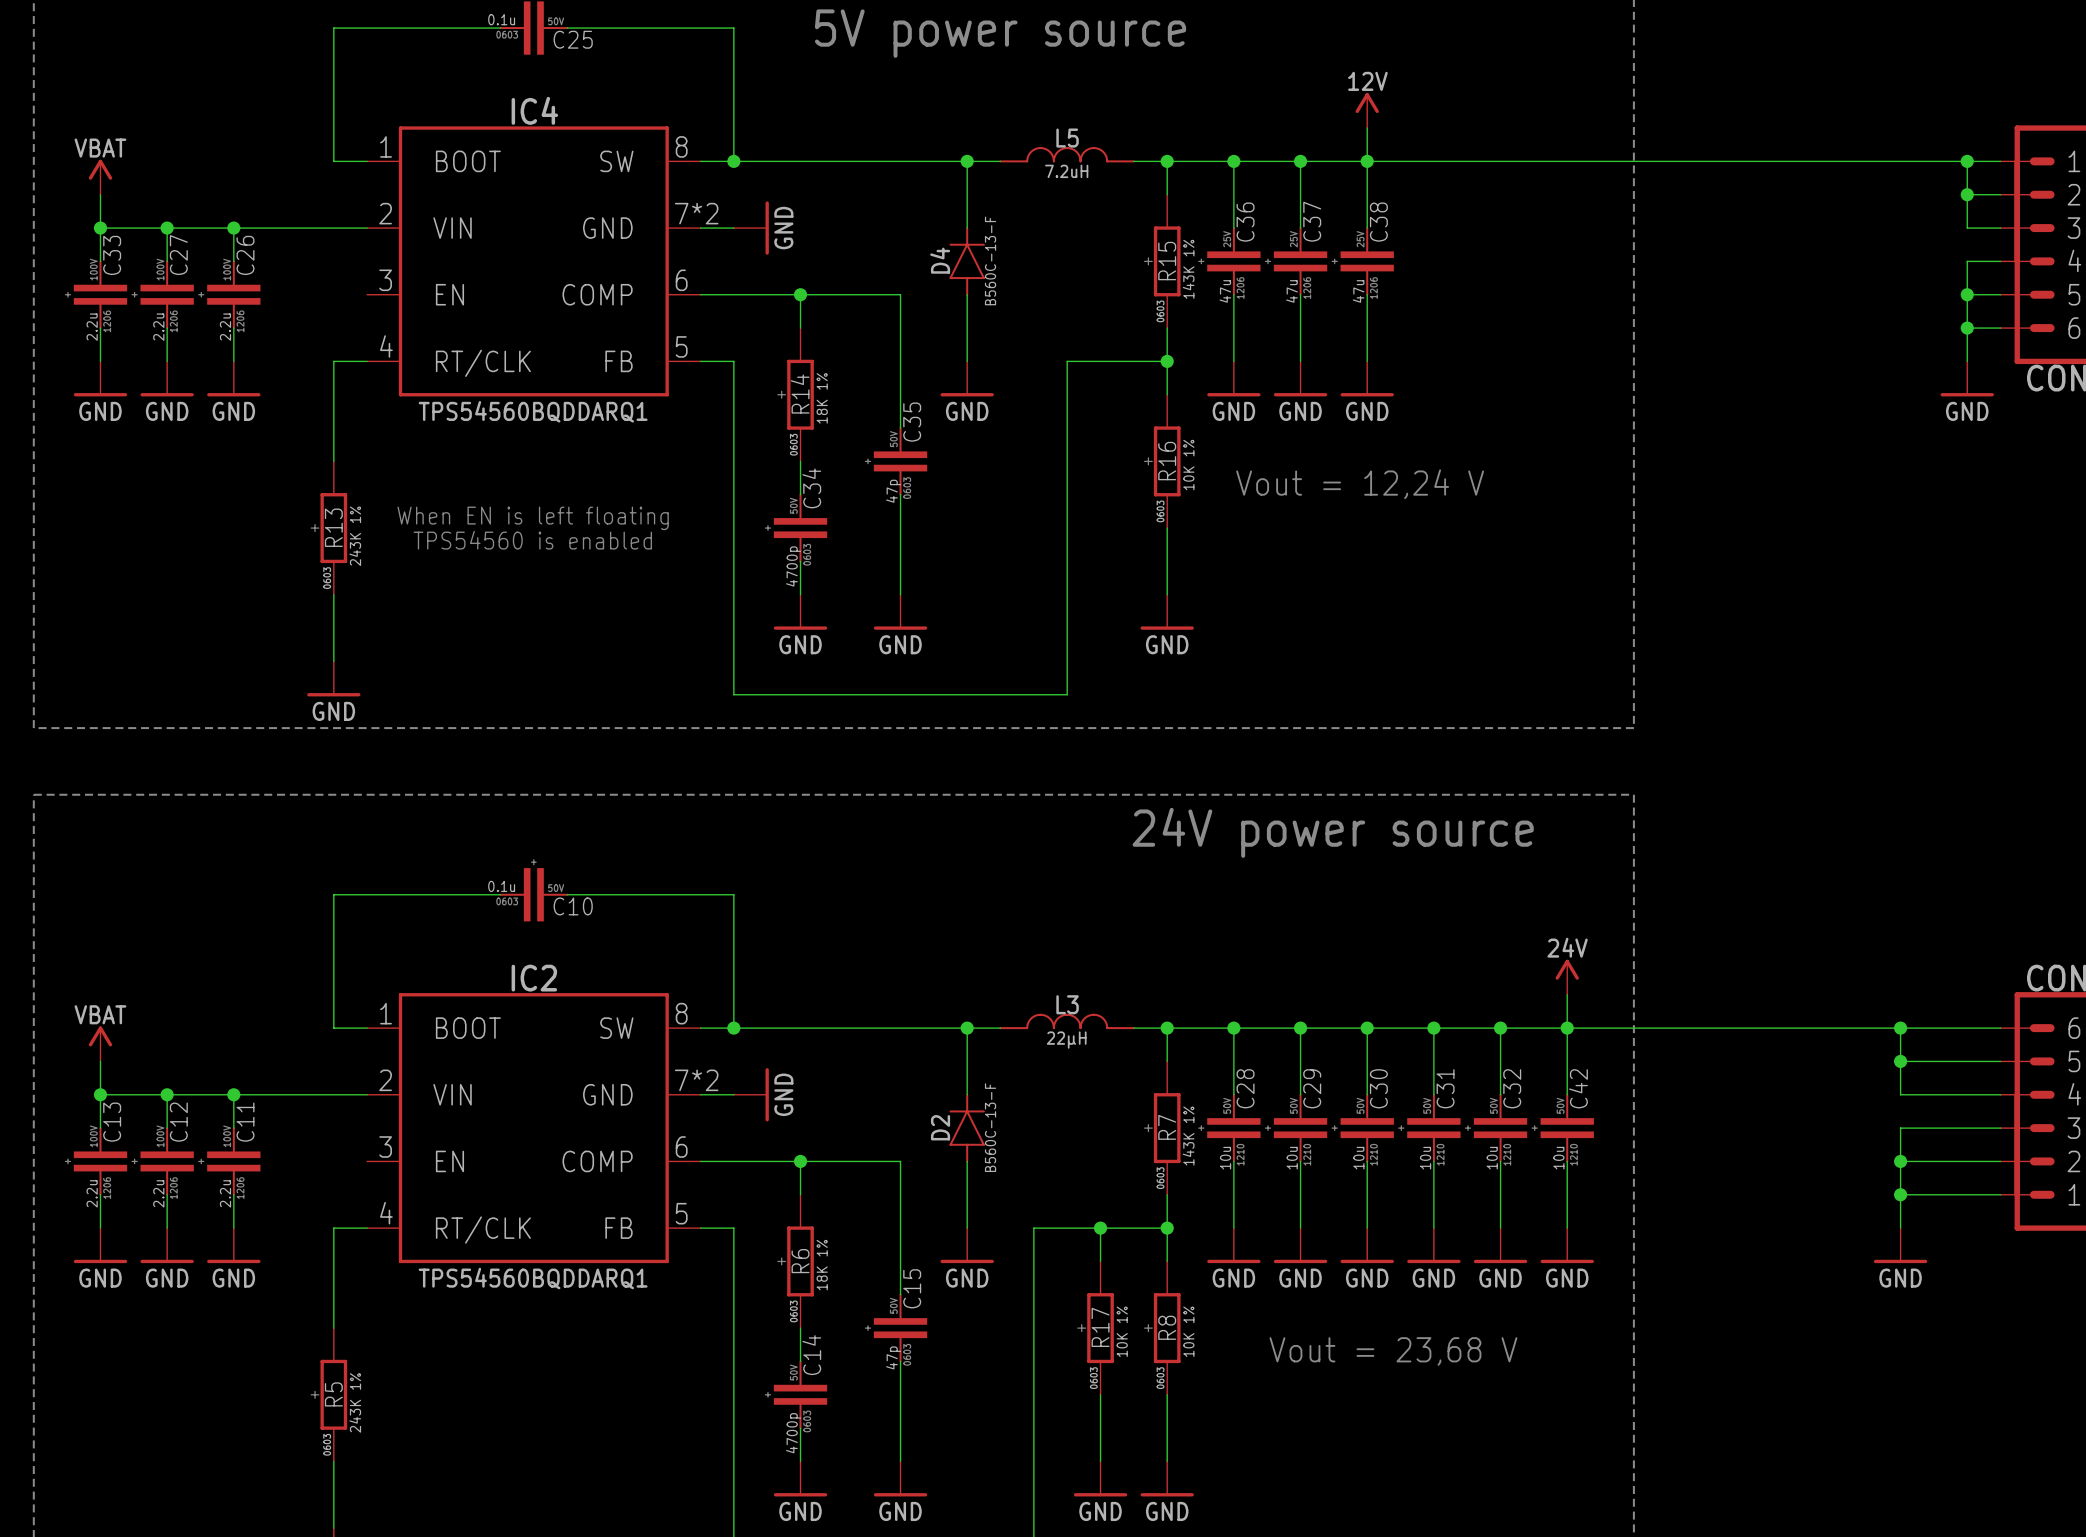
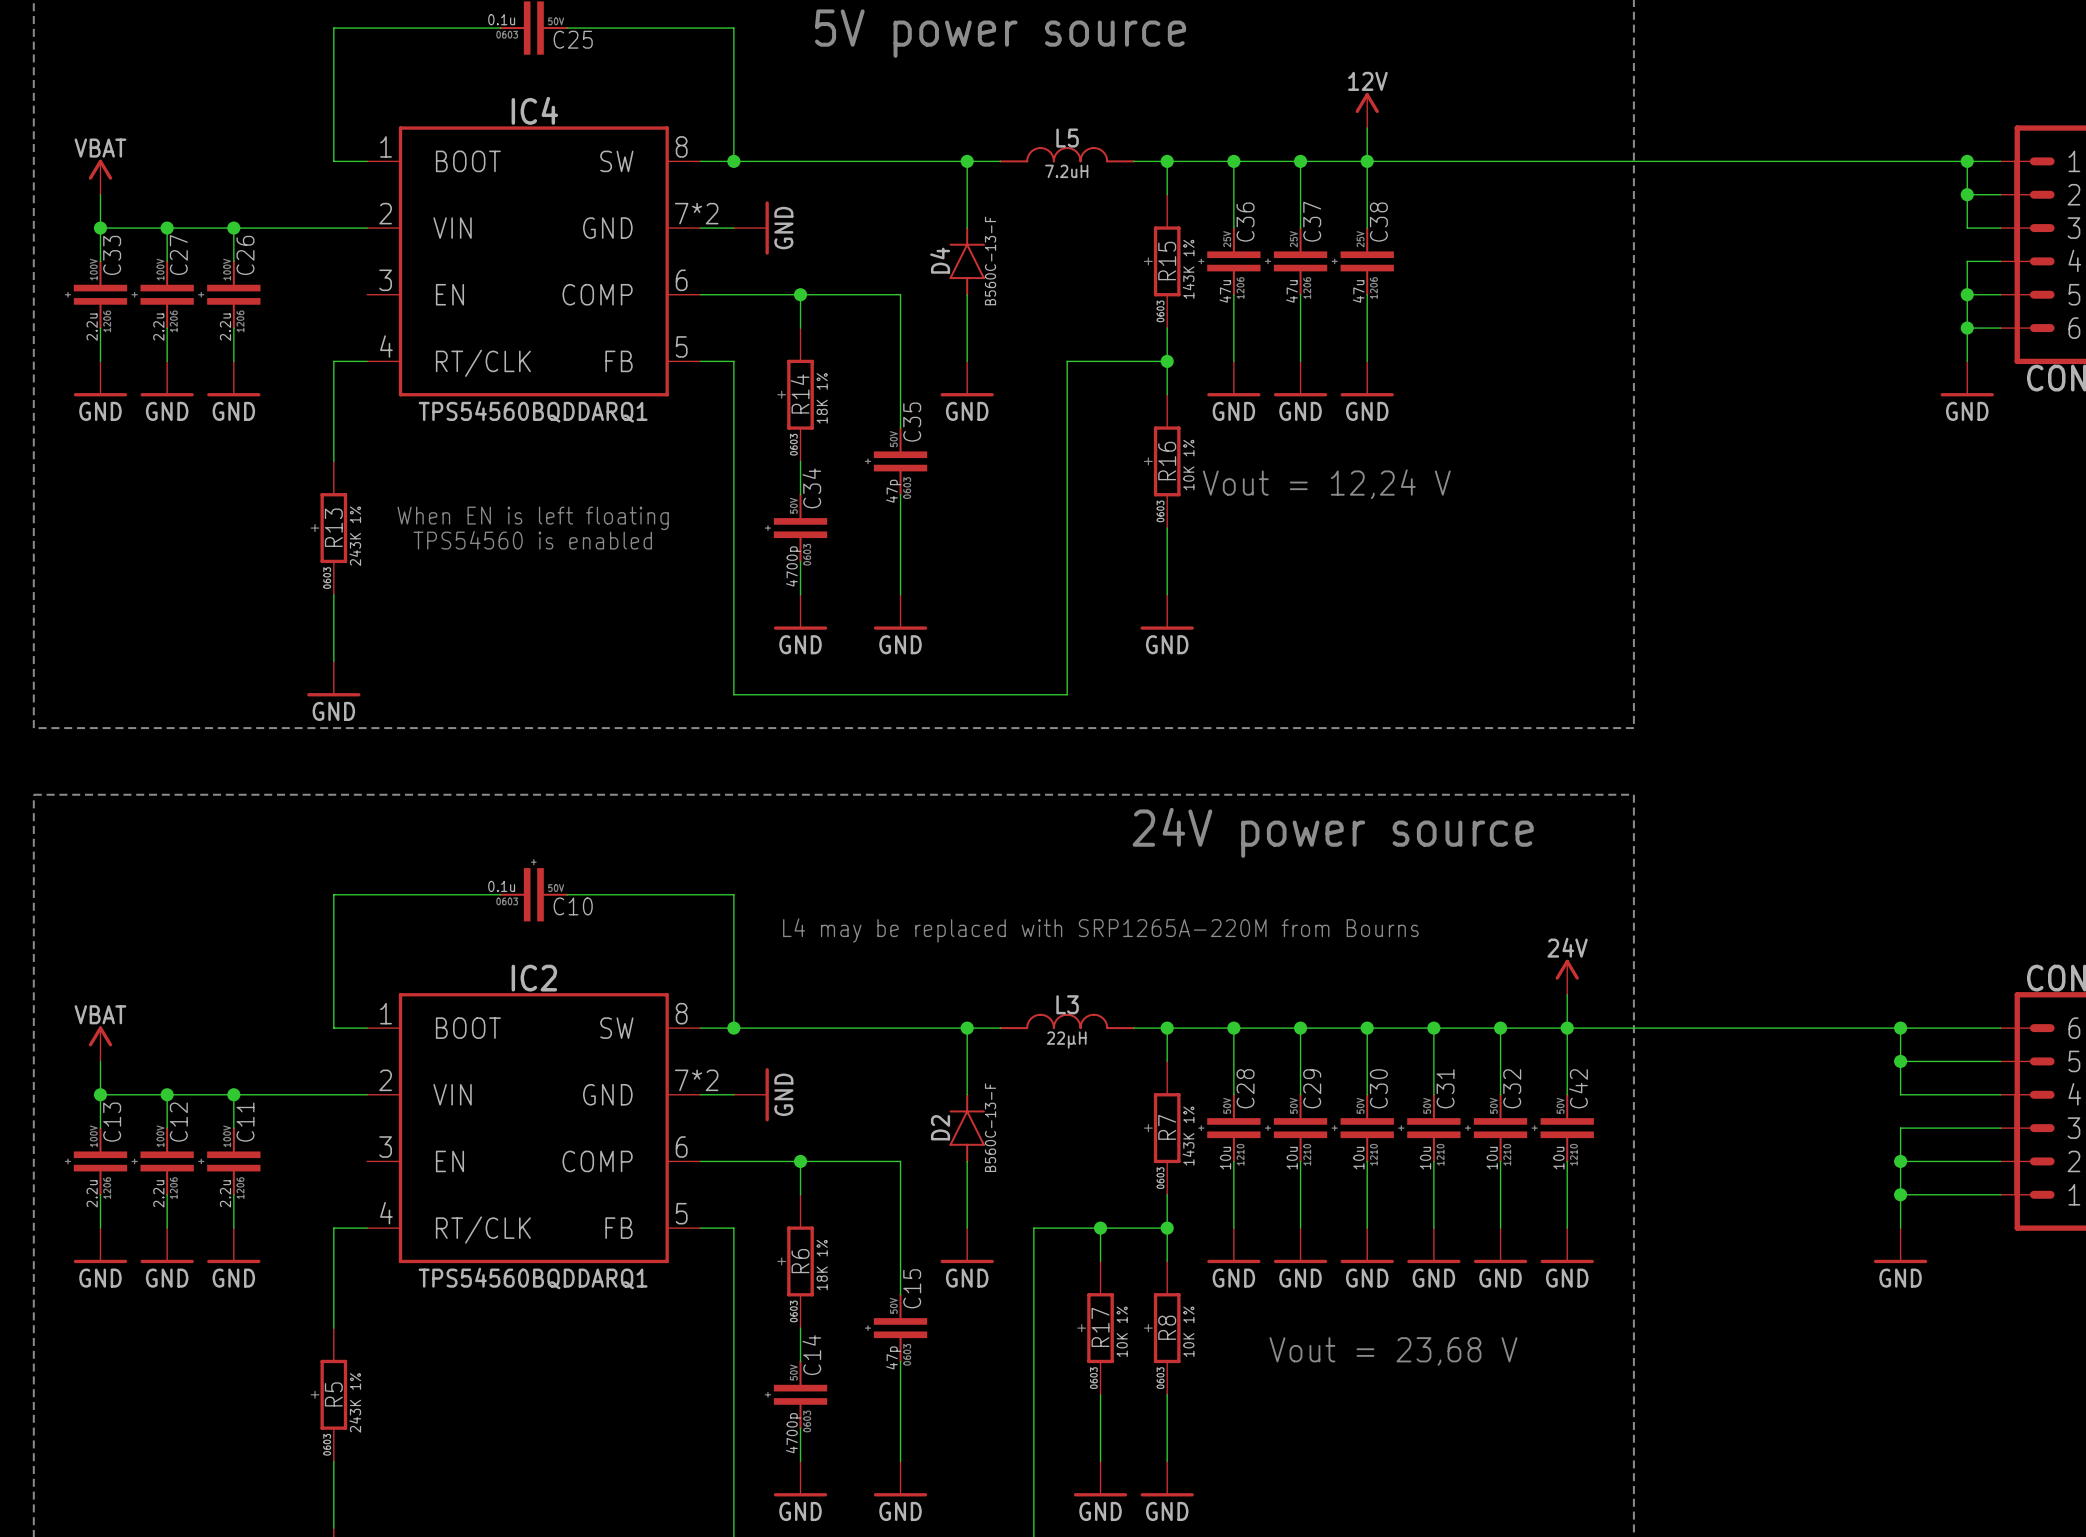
text position: Vout = 12,24 V (1360, 484) -> Vout = 12,24 V (1326, 484)
text: none -> L4 may be replaced with SRP1265A-220M from Bourns (1100, 930)

